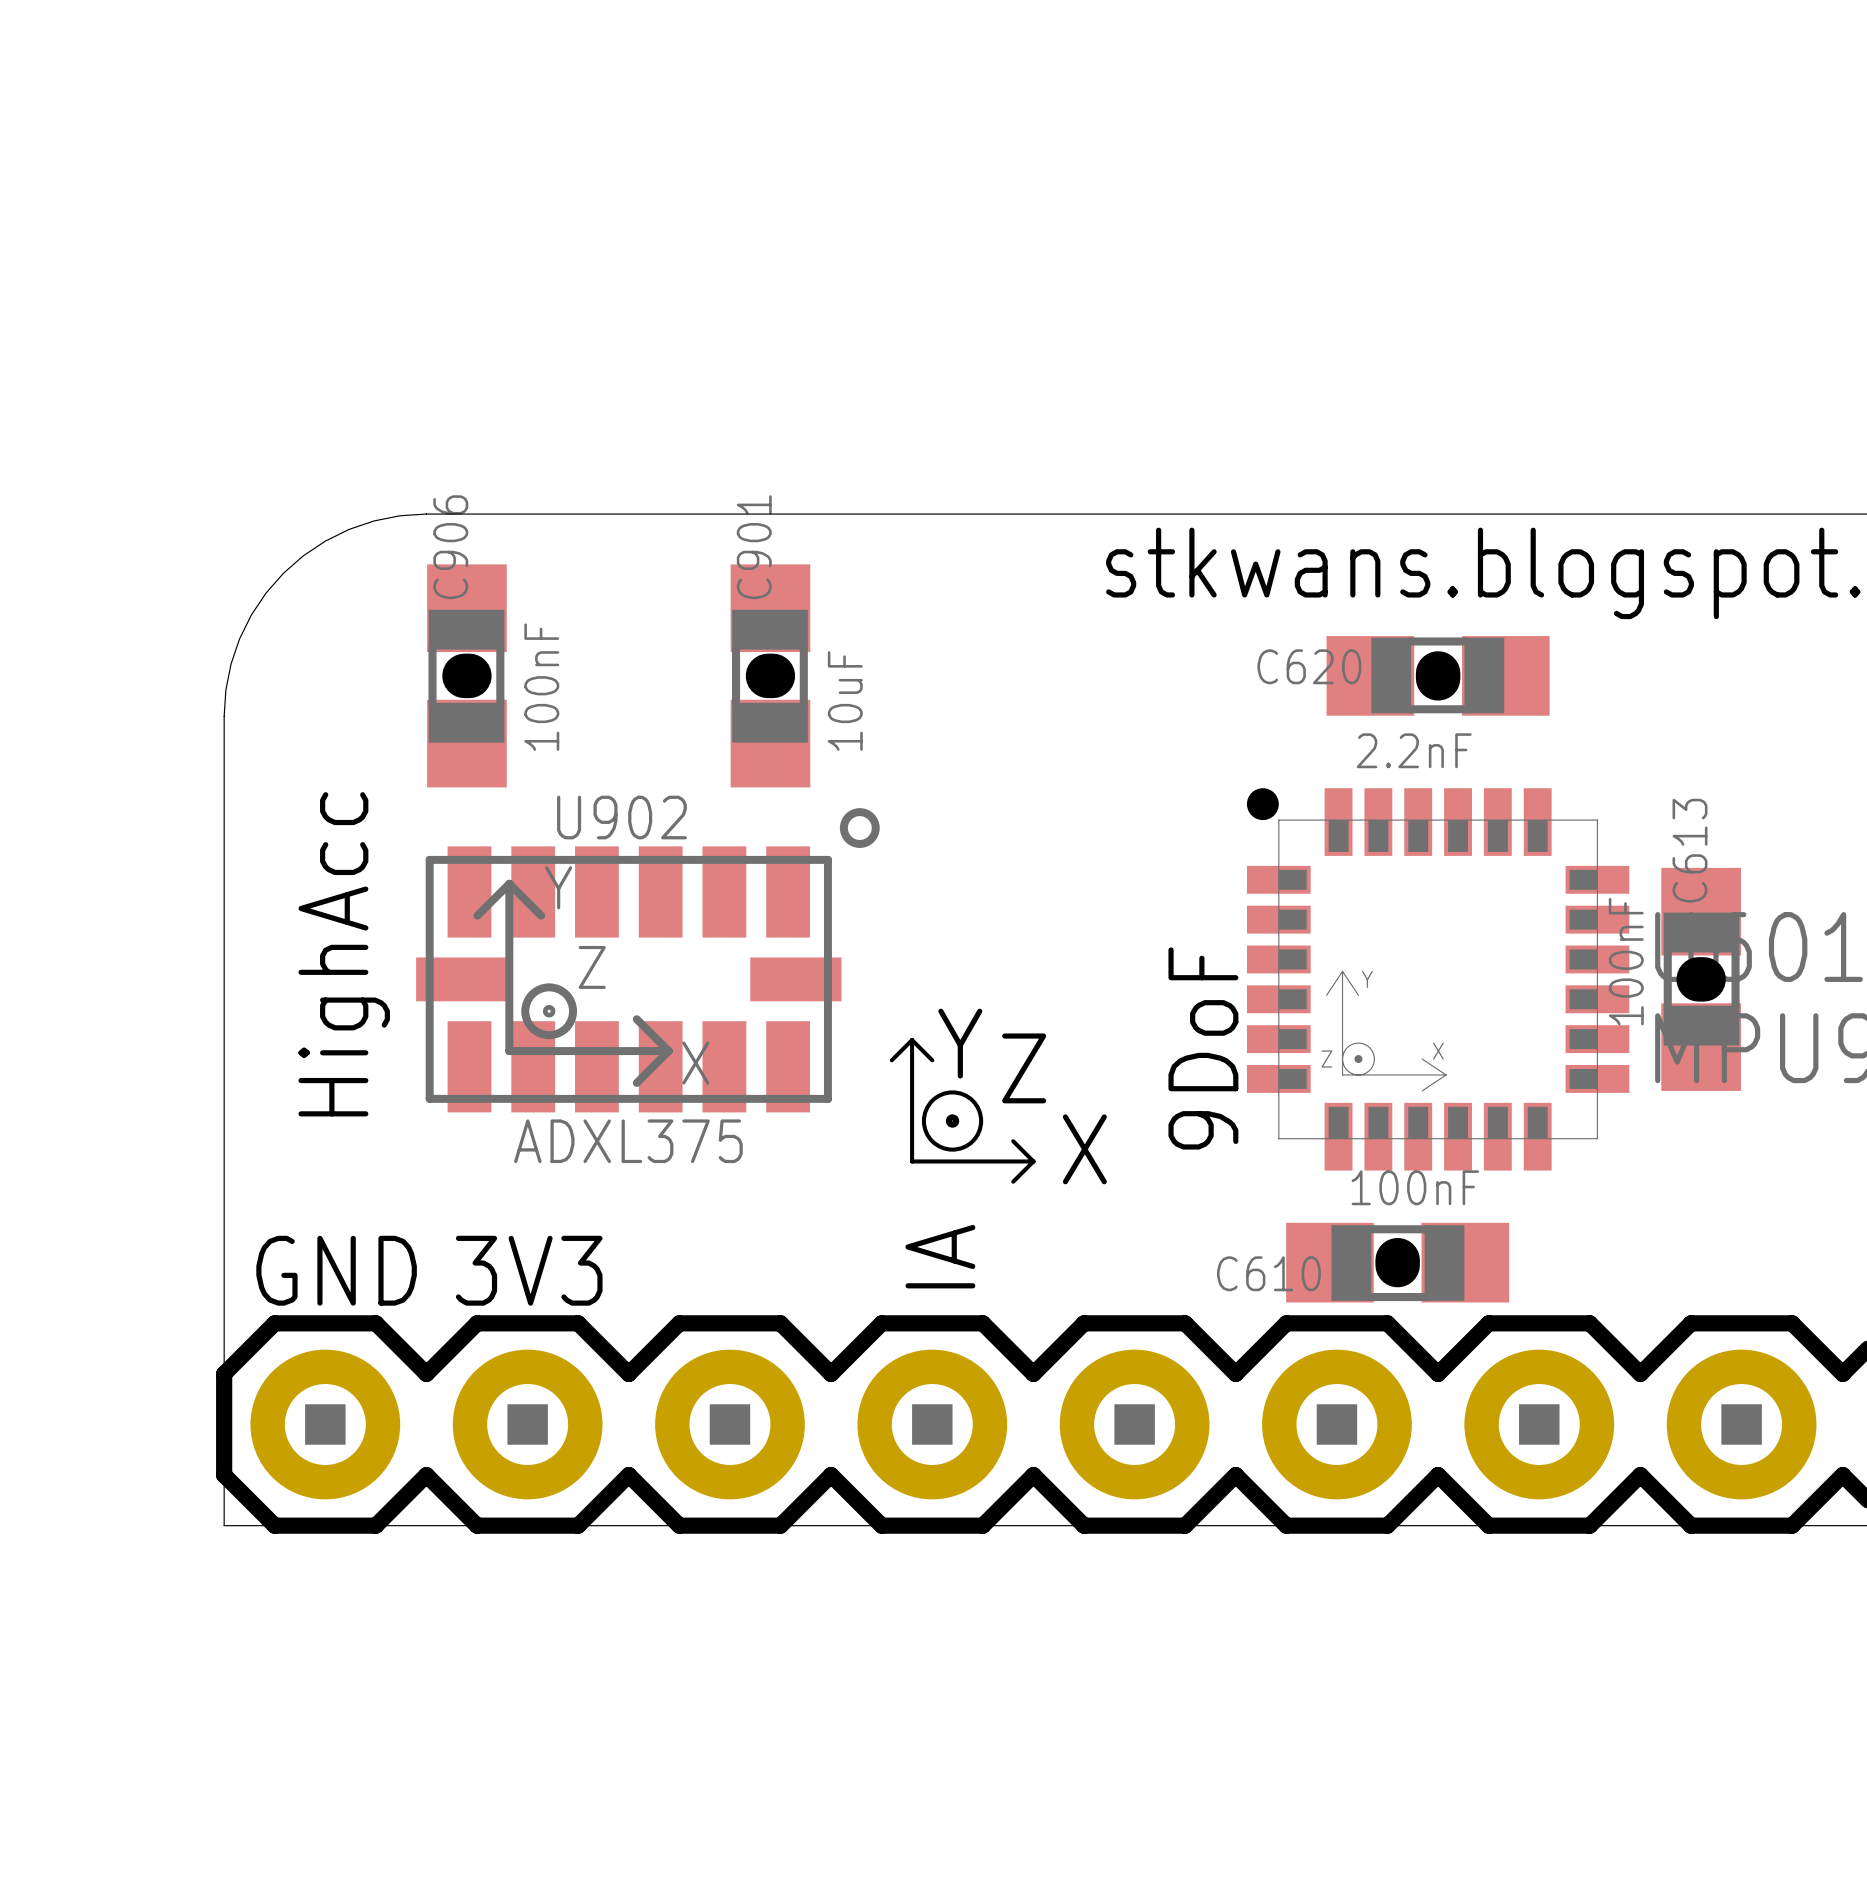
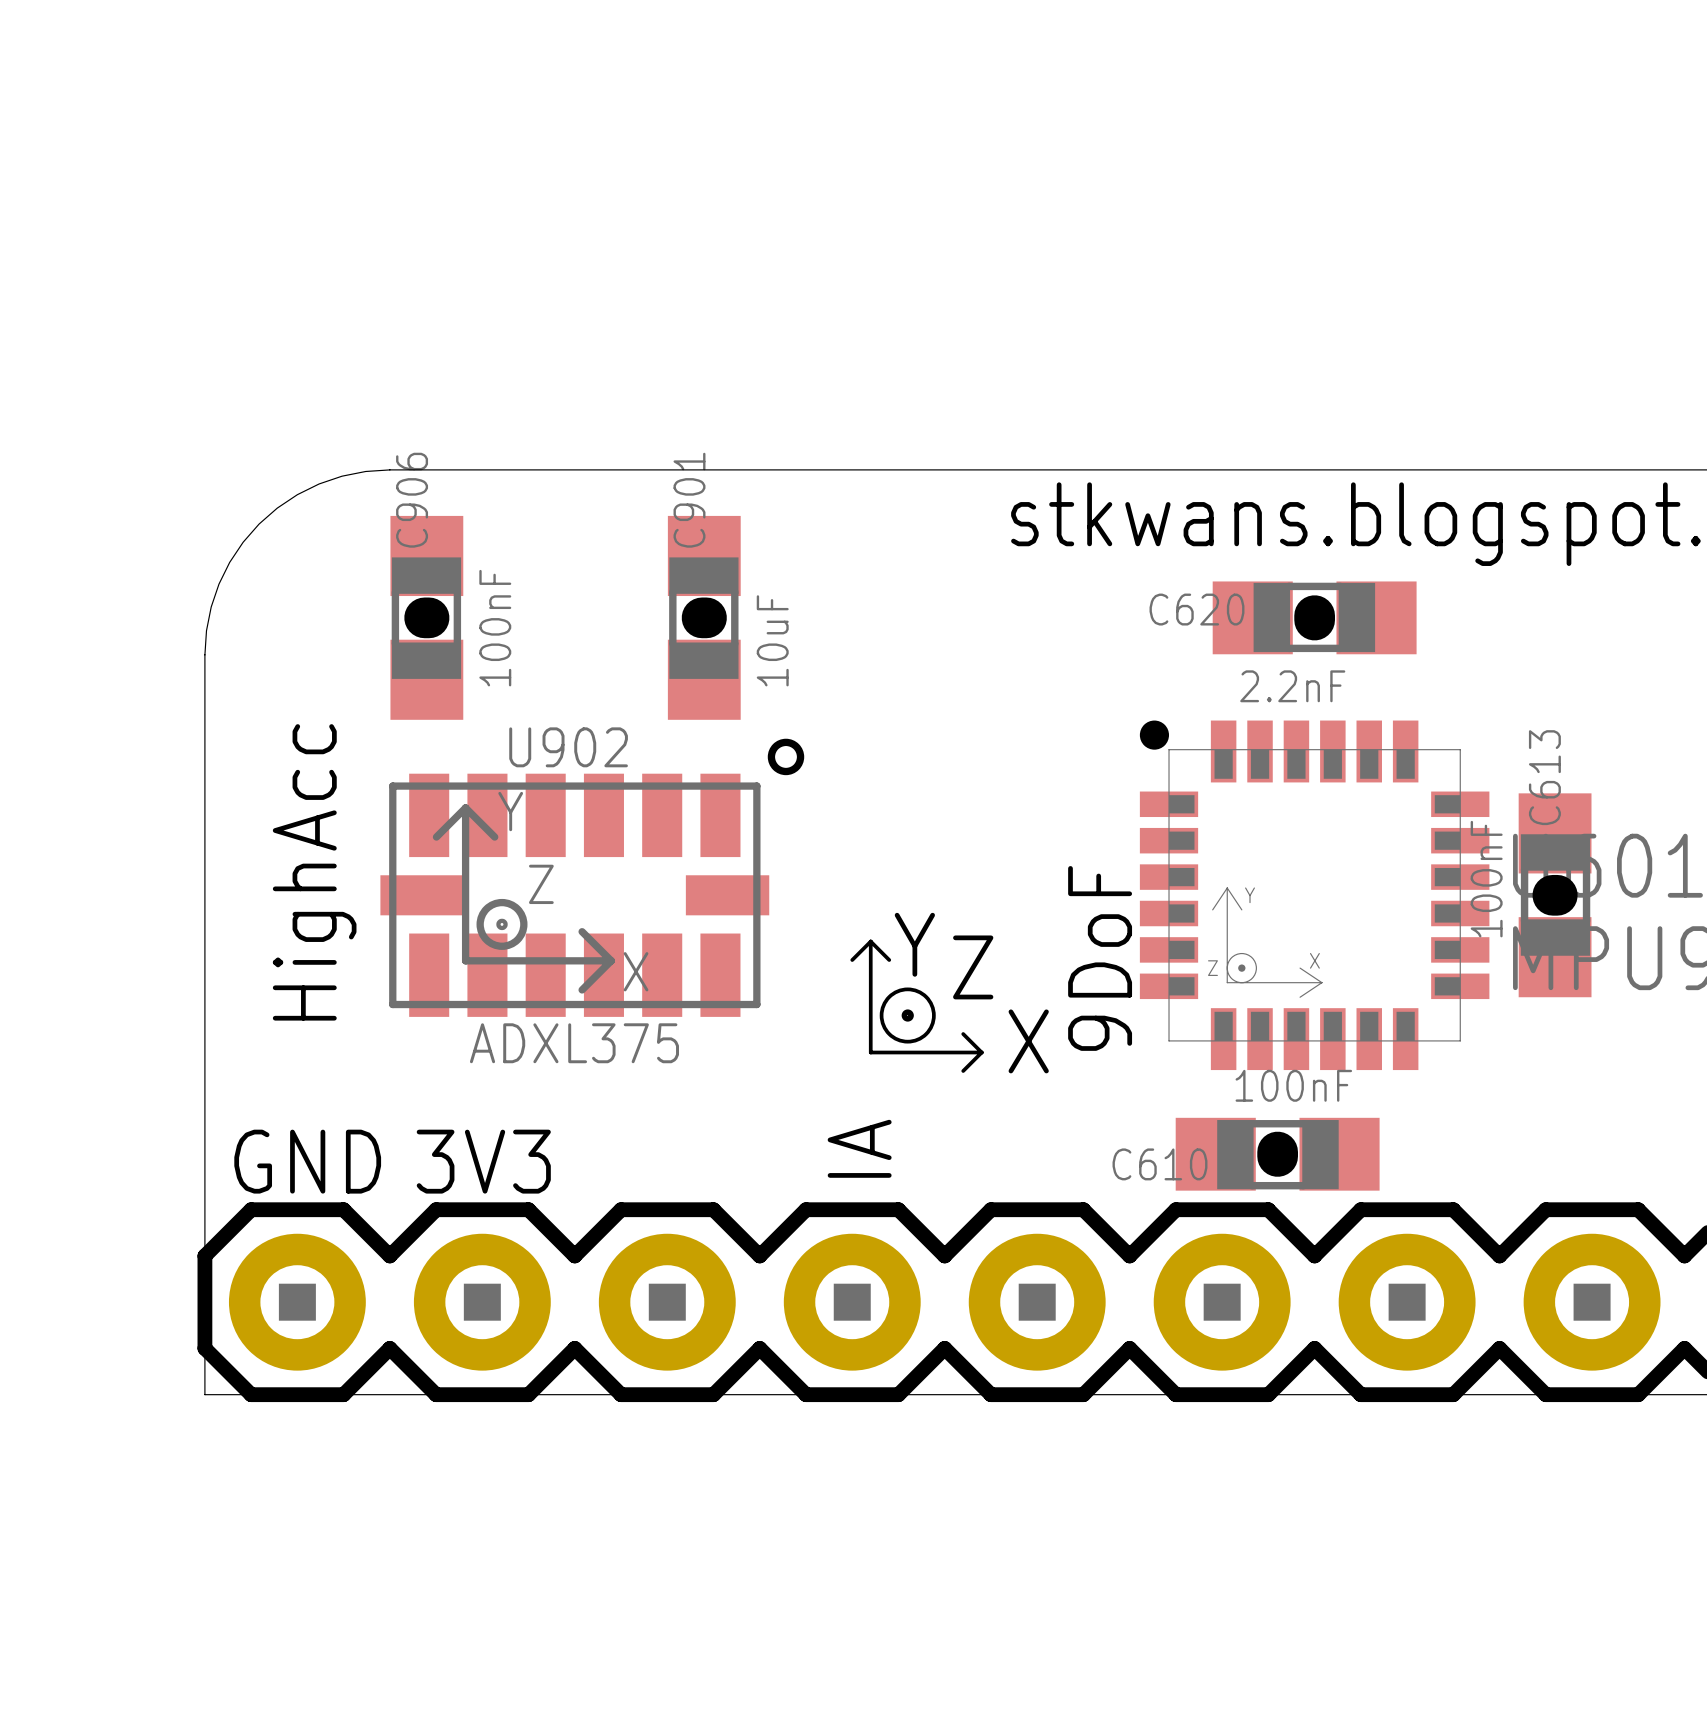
U902 footprint: [416, 808, 880, 1113] -> [380, 738, 805, 1017]
drawing position: (962, 1110) -> (916, 1006)

